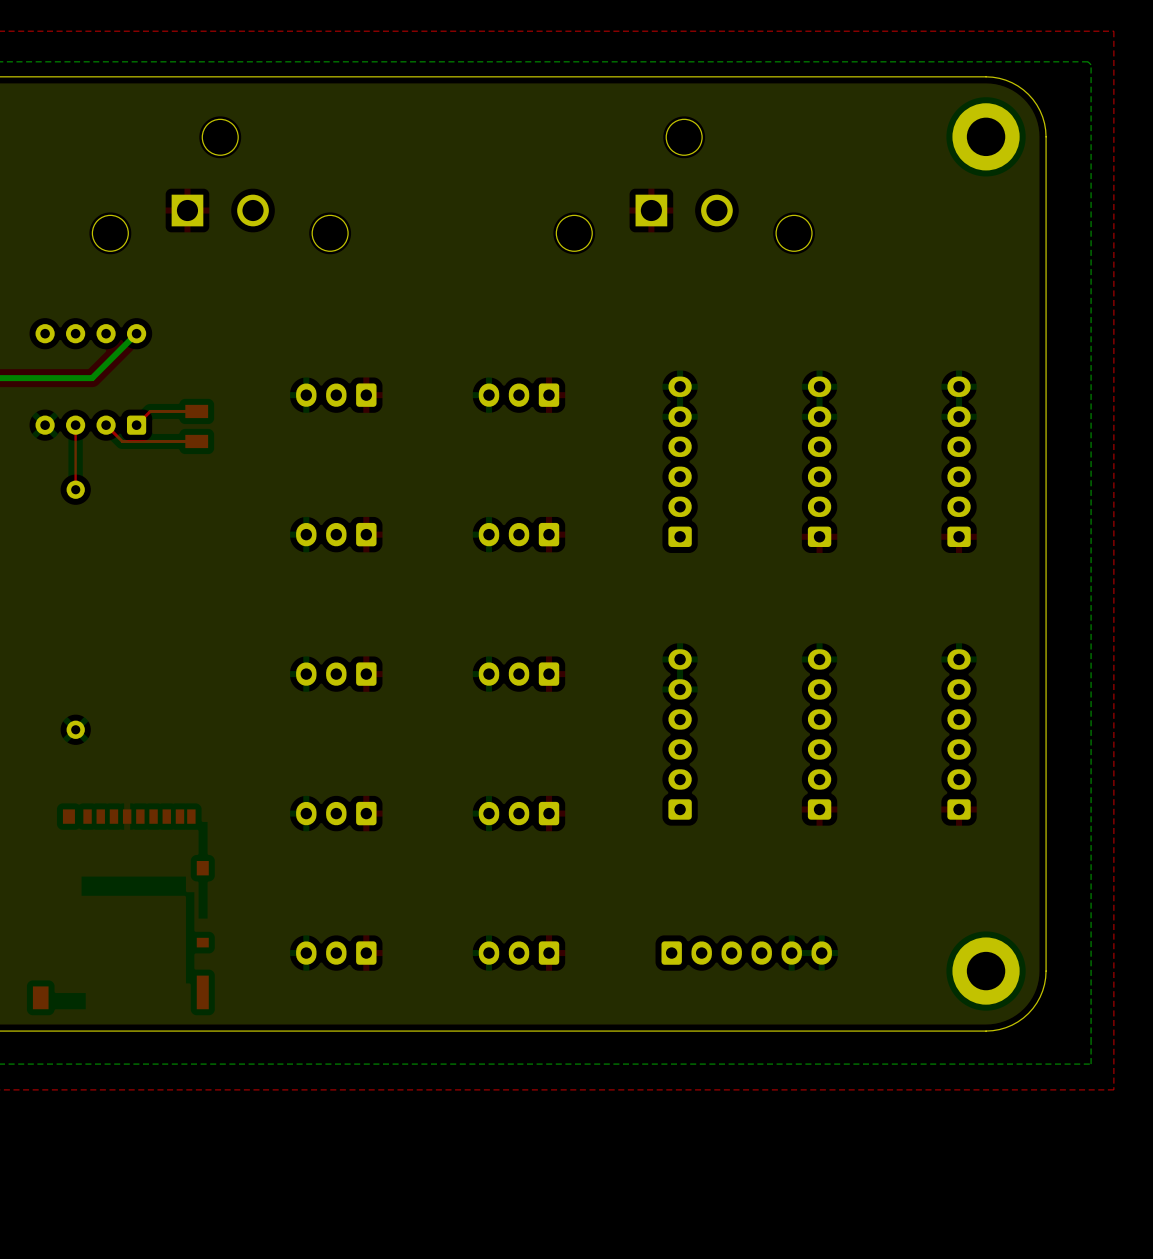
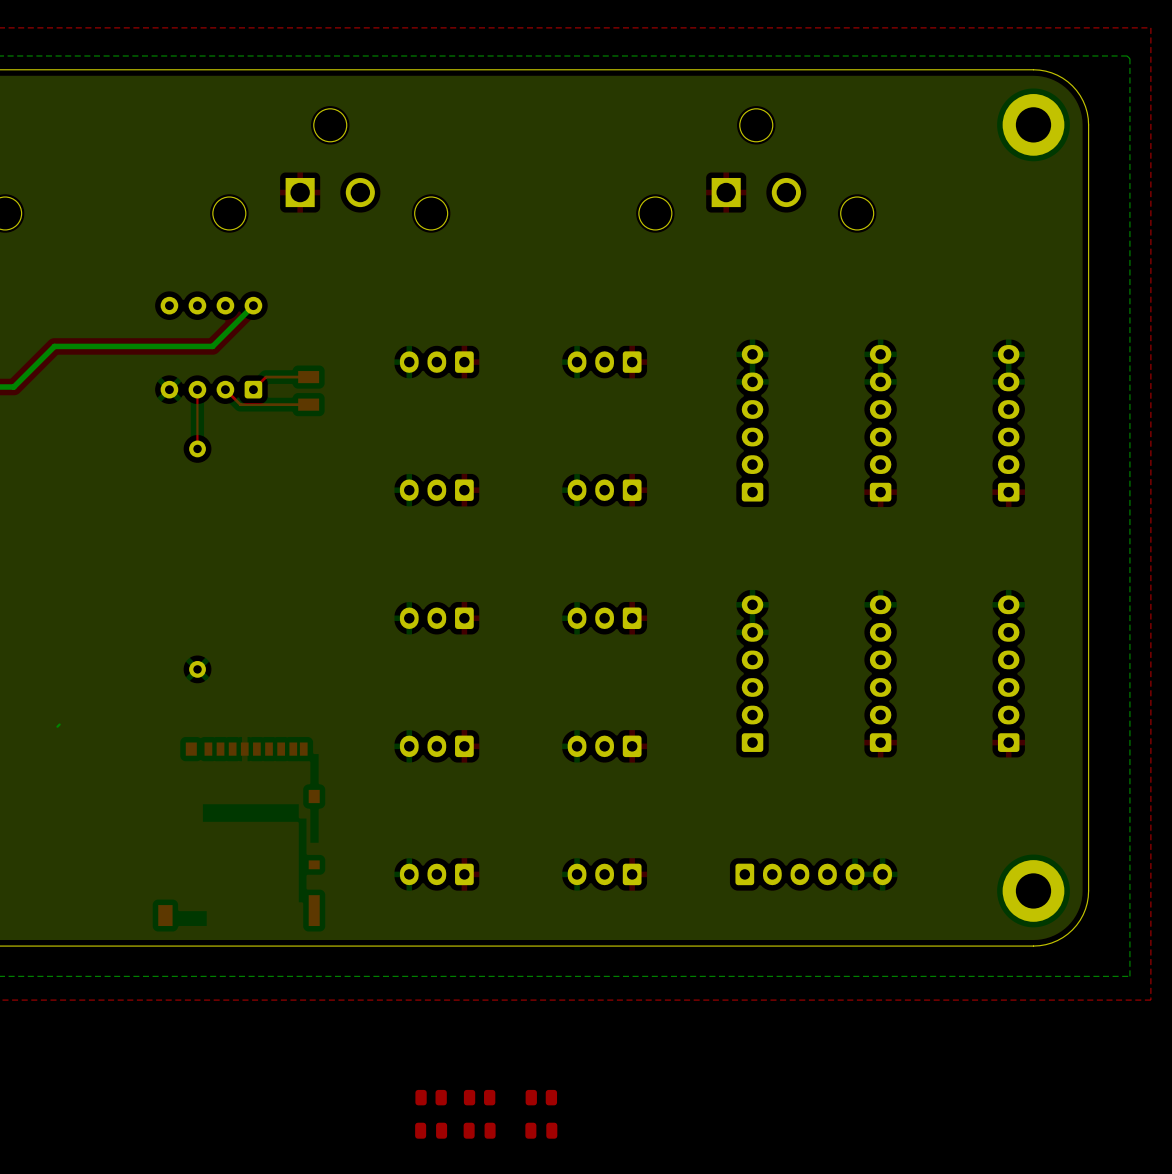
part: none -> (431, 1097)
part: none -> (479, 1097)
part: none -> (541, 1097)
part: none -> (431, 1130)
part: none -> (479, 1130)
part: none -> (541, 1130)

